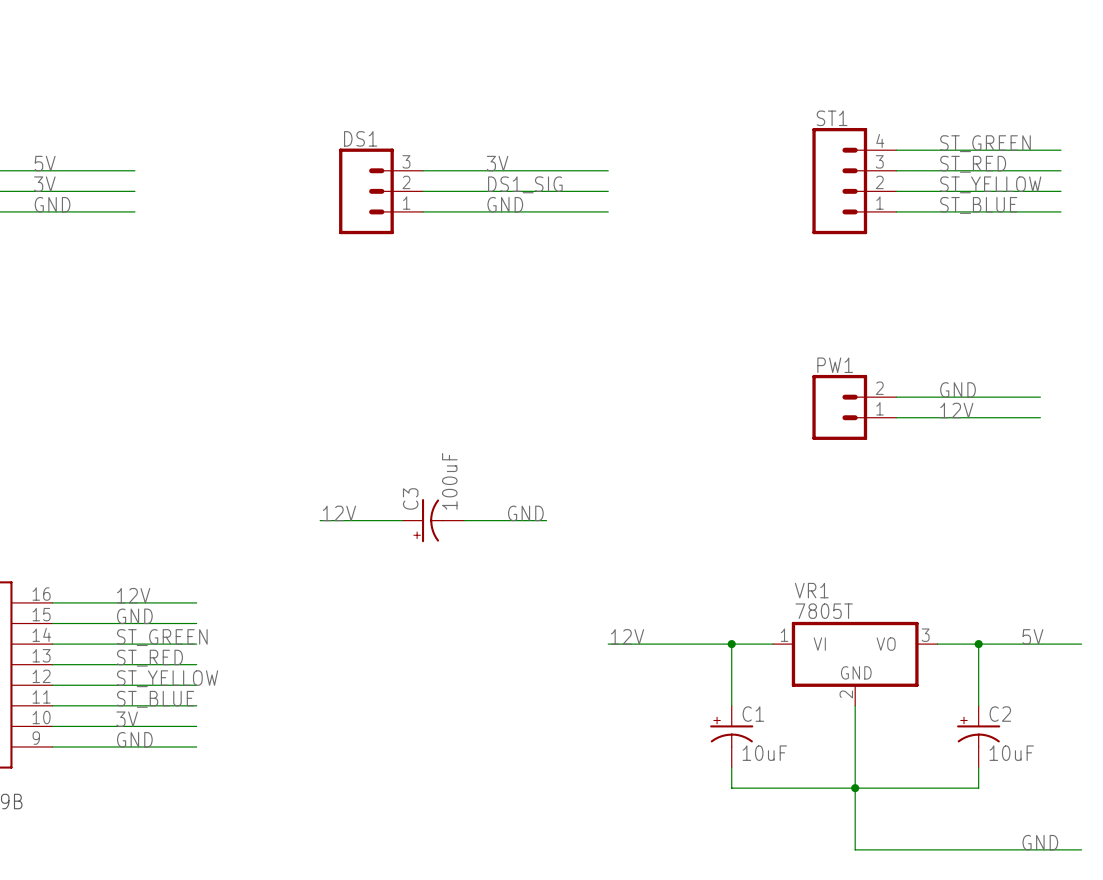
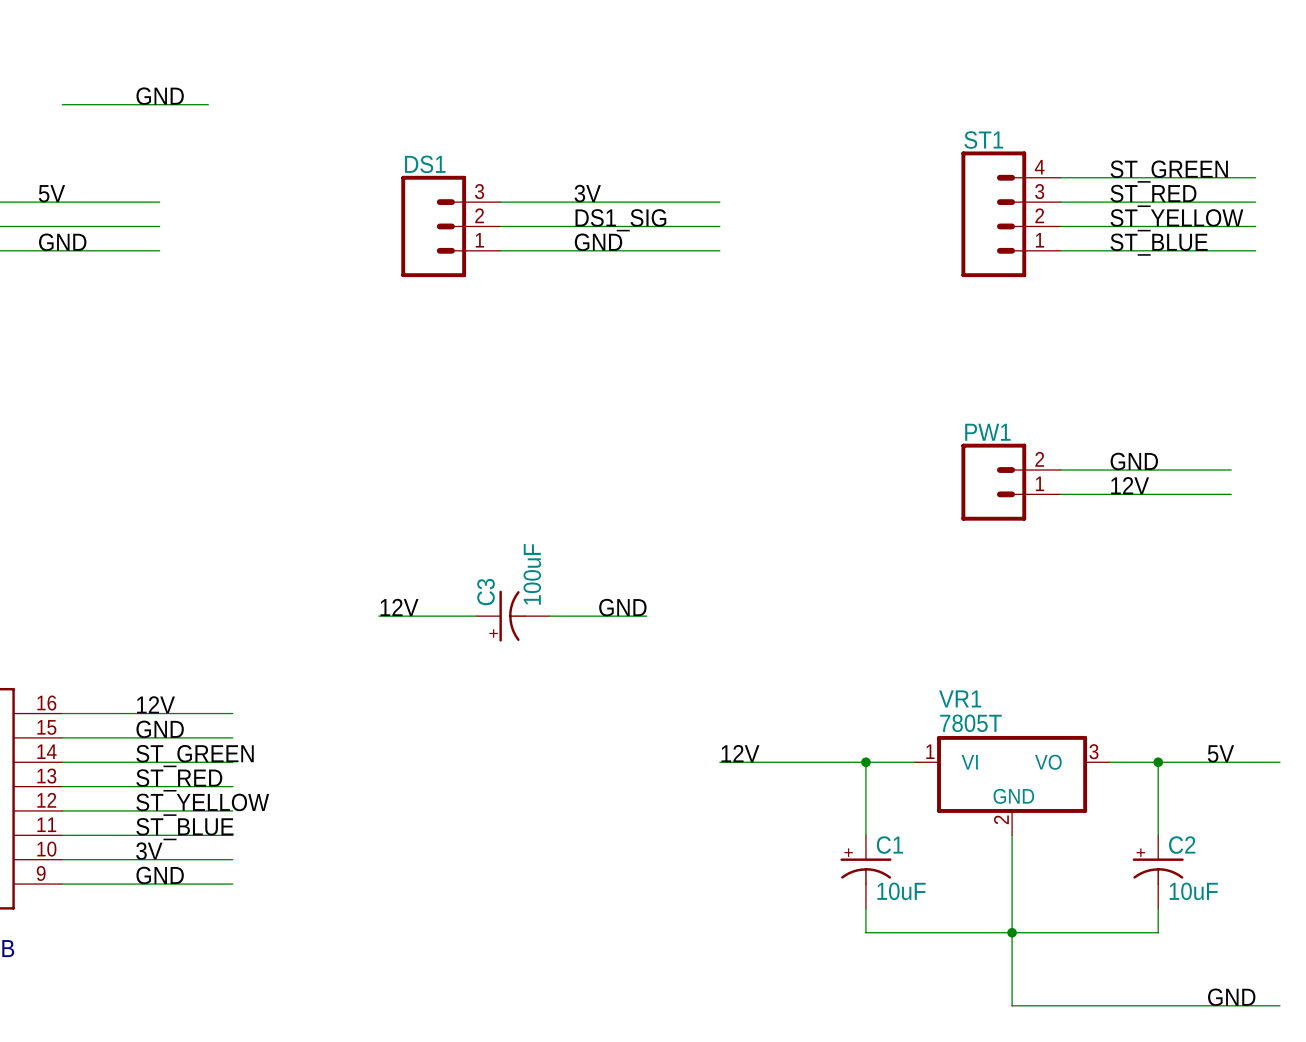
label: none -> GND (160, 96)
wire: none -> (62, 104) (208, 104)
label: 3V (44, 184) -> none

